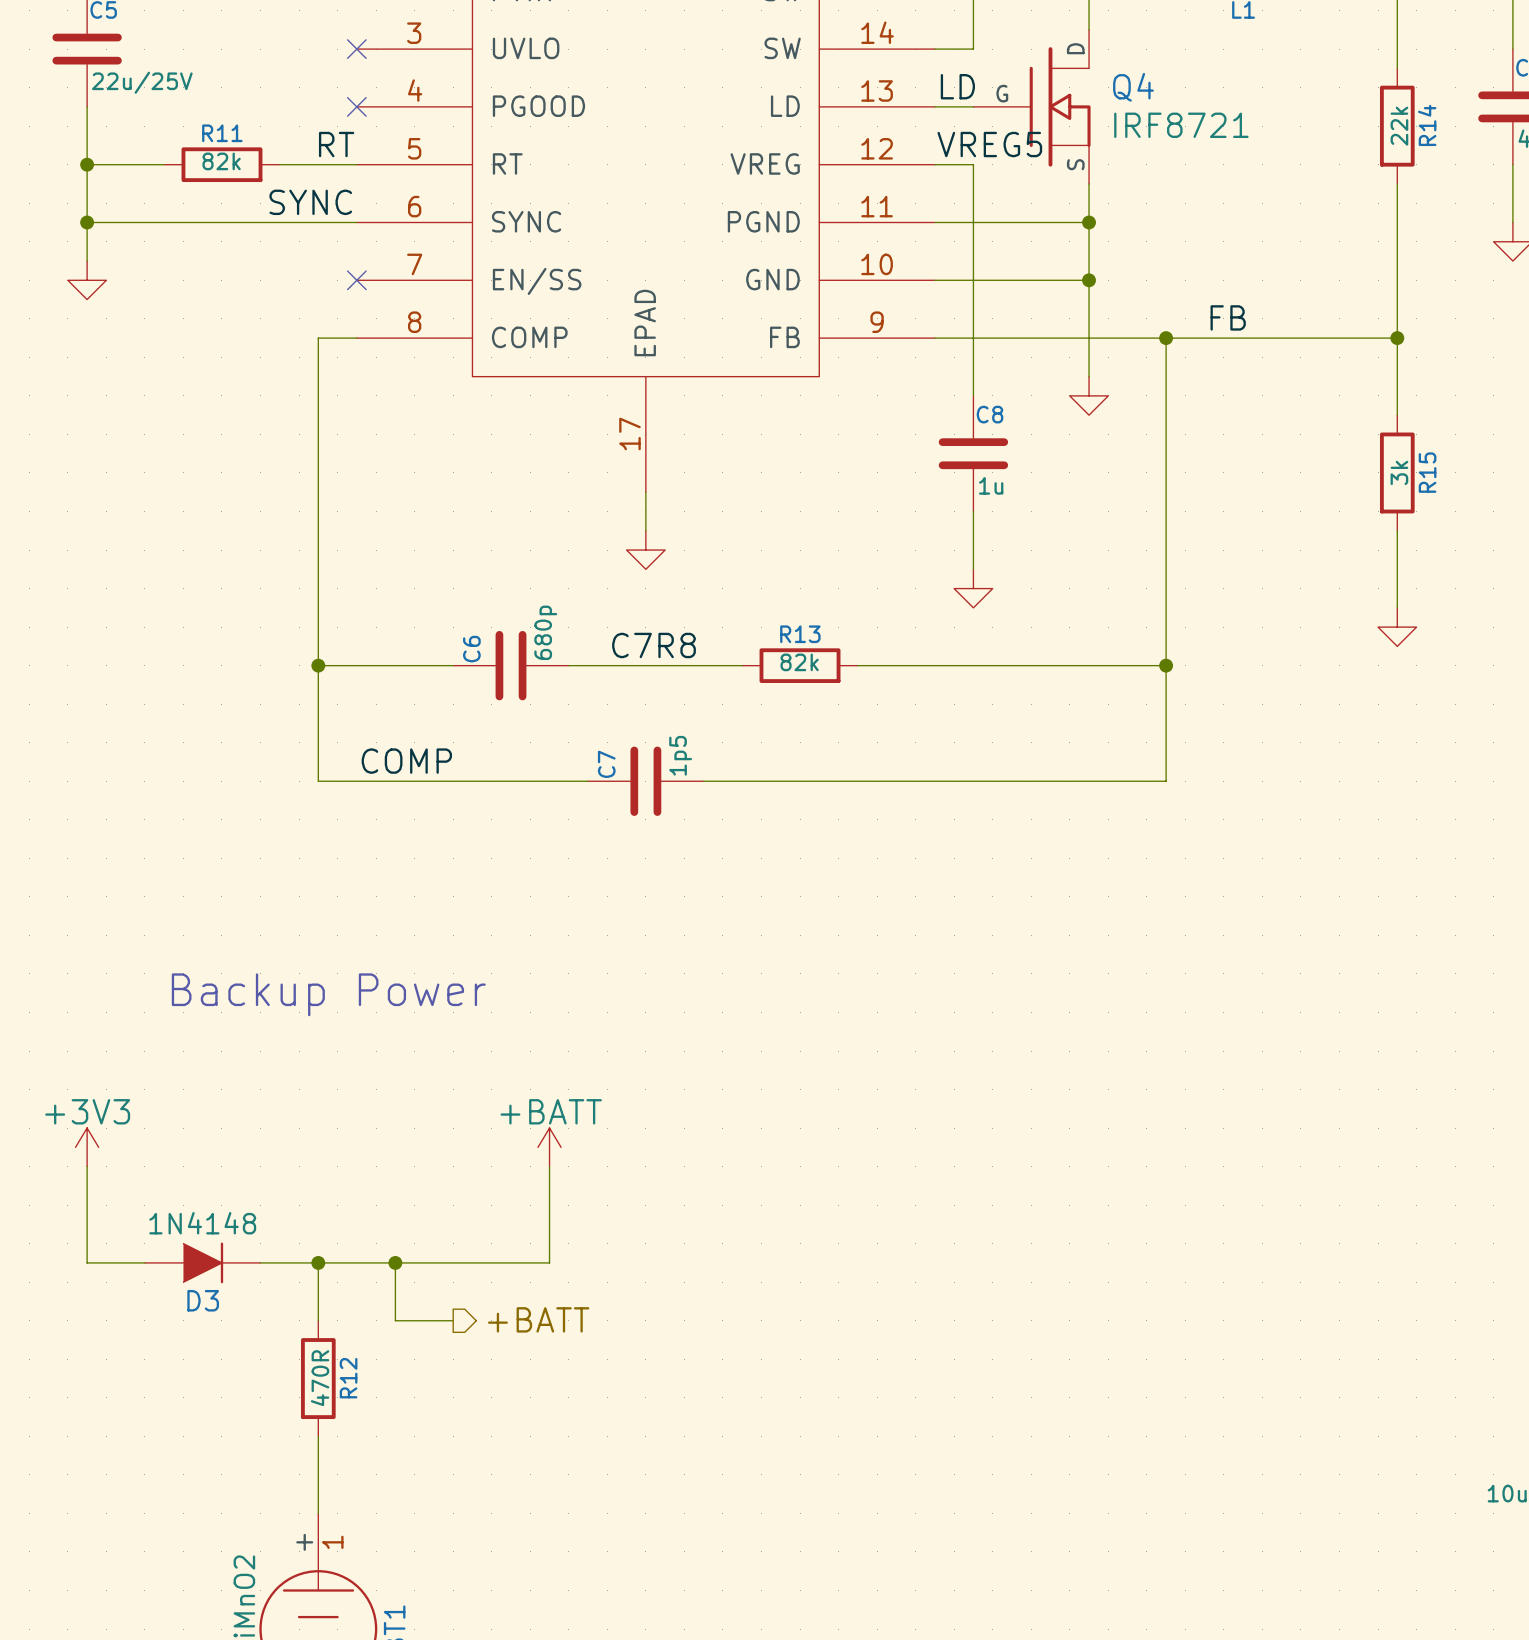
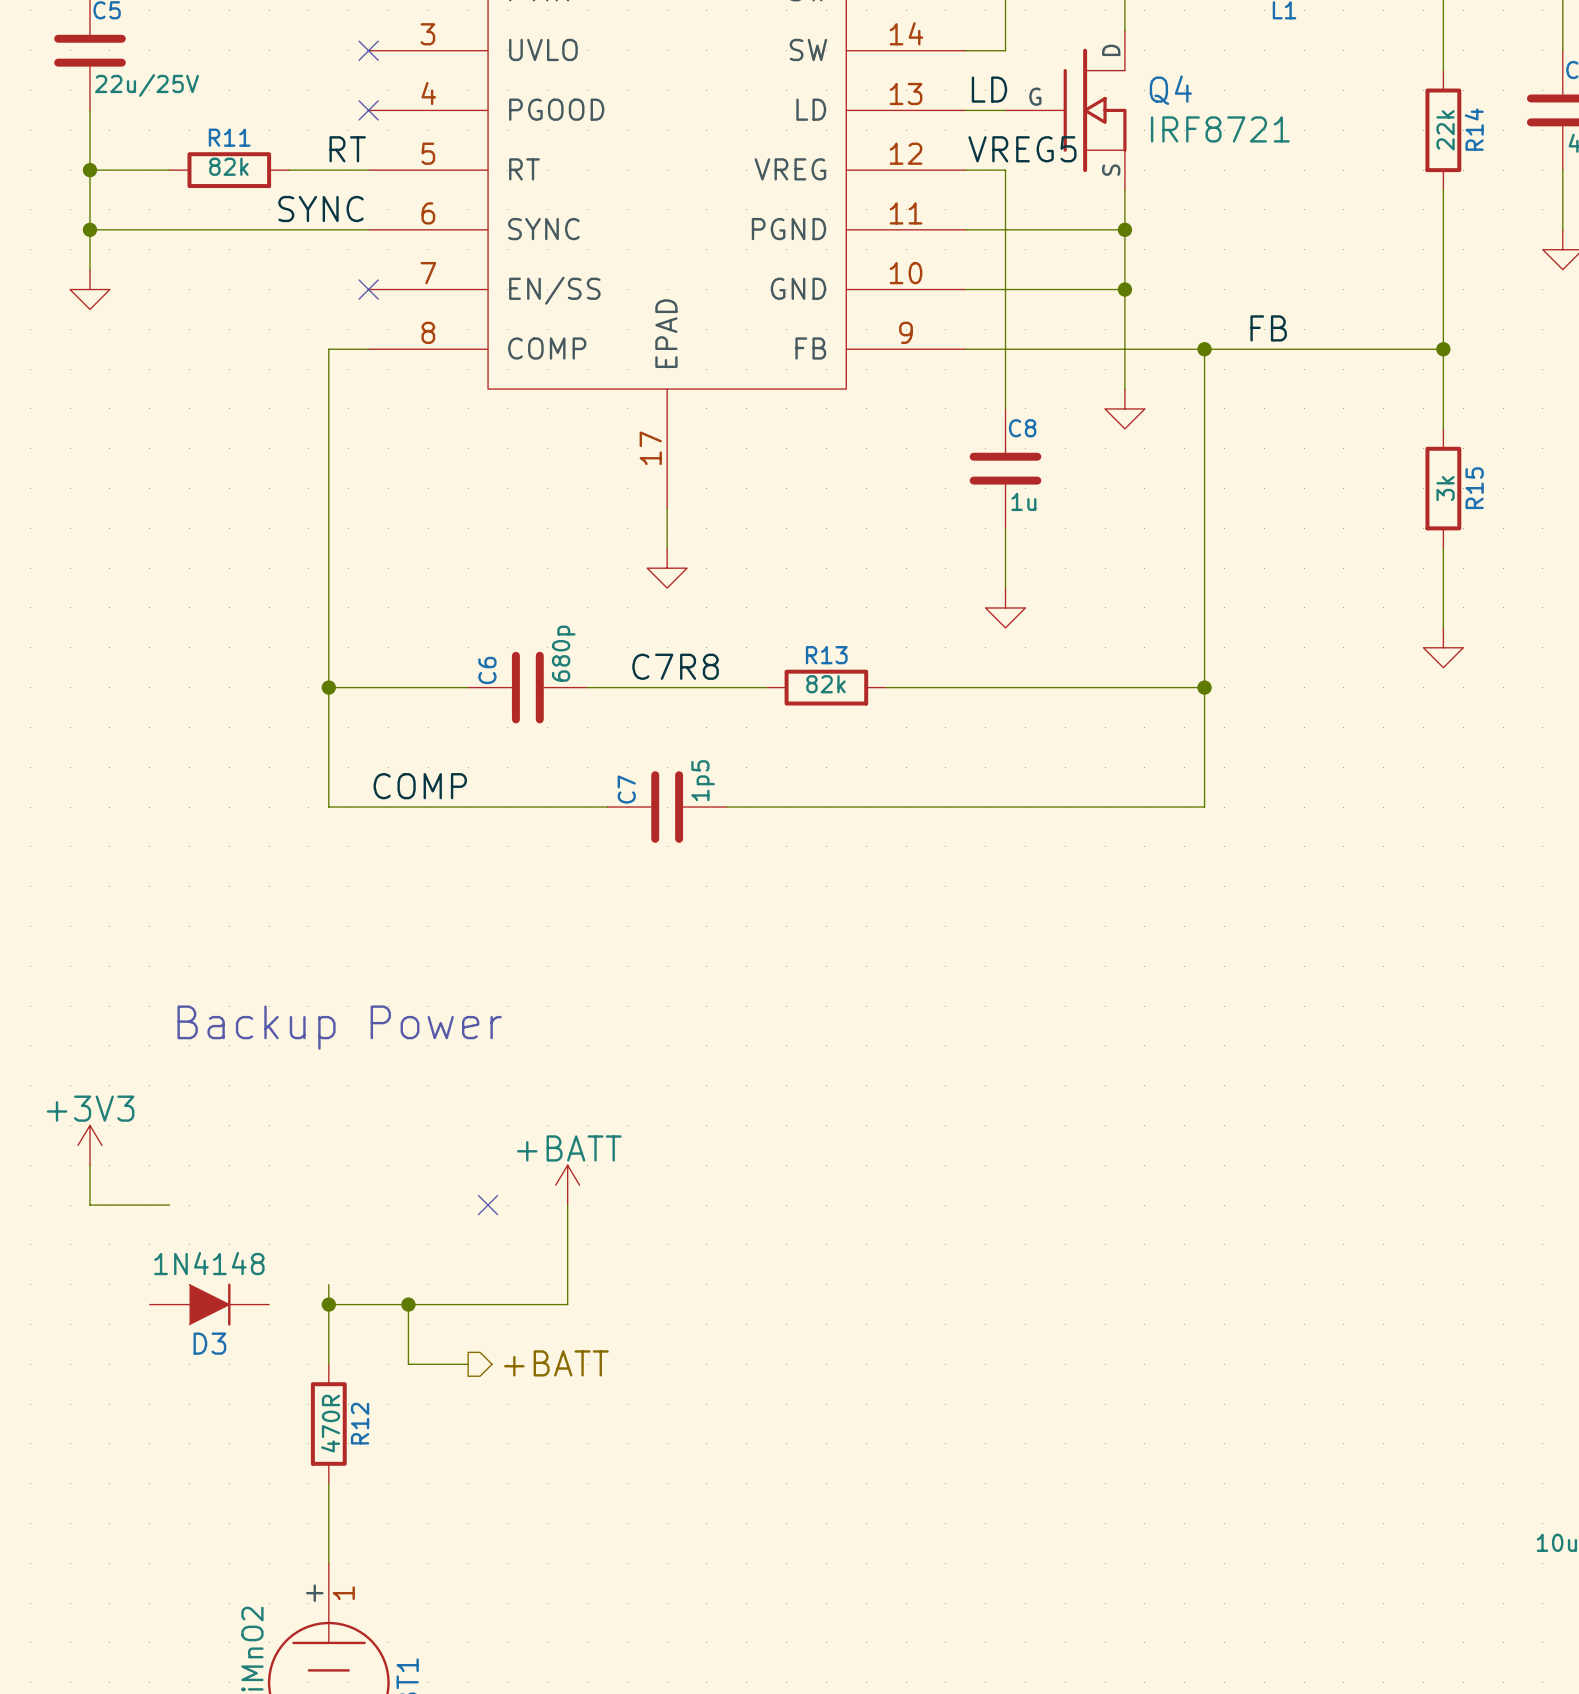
wire: none -> (89, 1165) (89, 1205) (169, 1205)
power symbol position: +3V3 (87, 1147) -> +3V3 (89, 1145)
wire: (87, 1166) (87, 1262) (144, 1262) -> none
no-connect mark: none -> (488, 1205)
wire: (260, 1262) (318, 1262) -> (328, 1284) (328, 1304)

